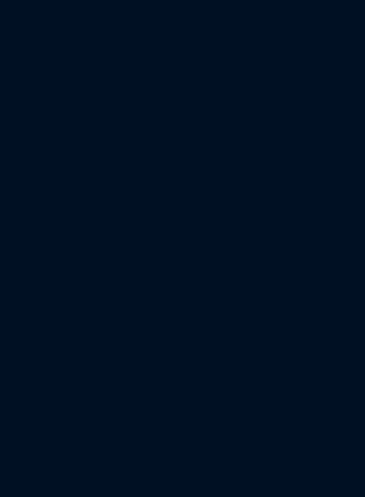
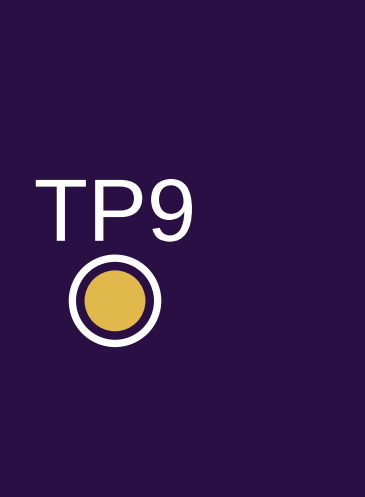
TP9: none -> (114, 300)

